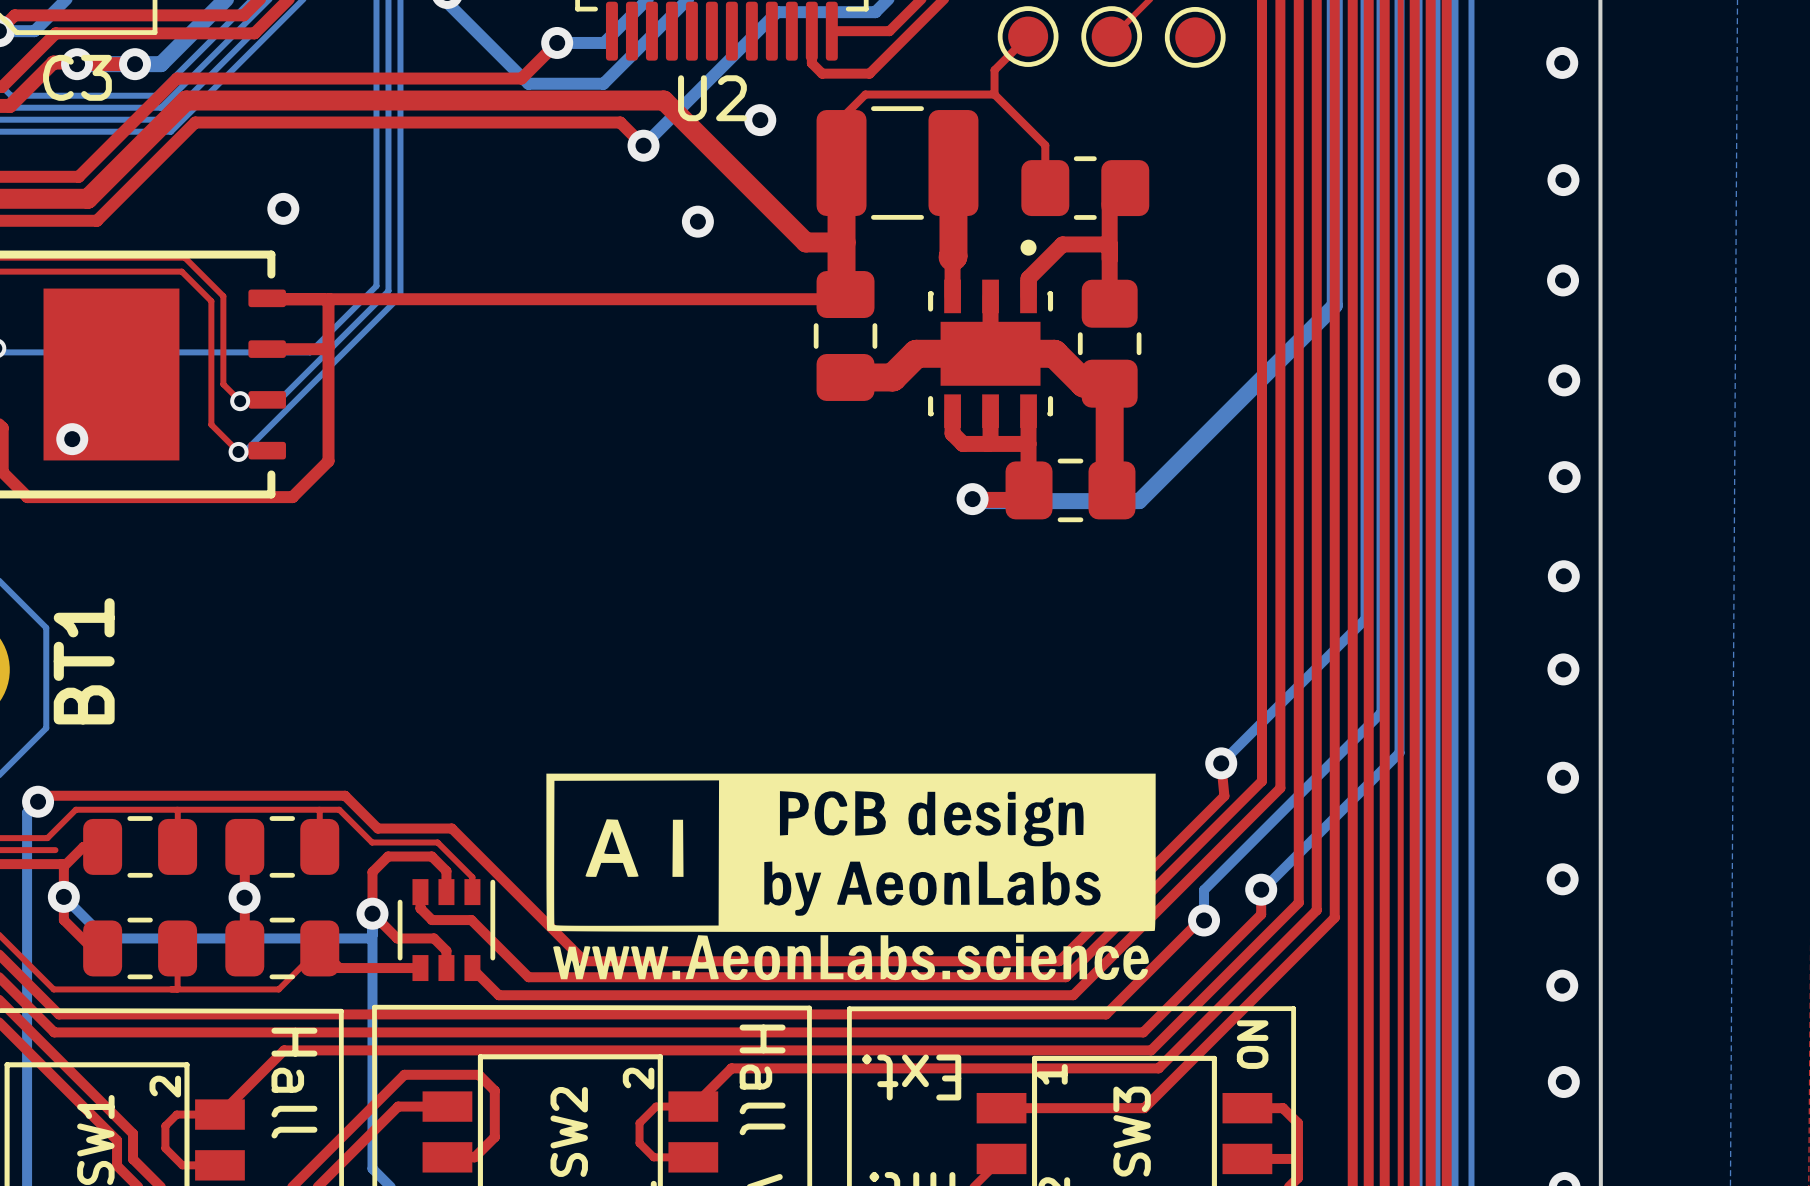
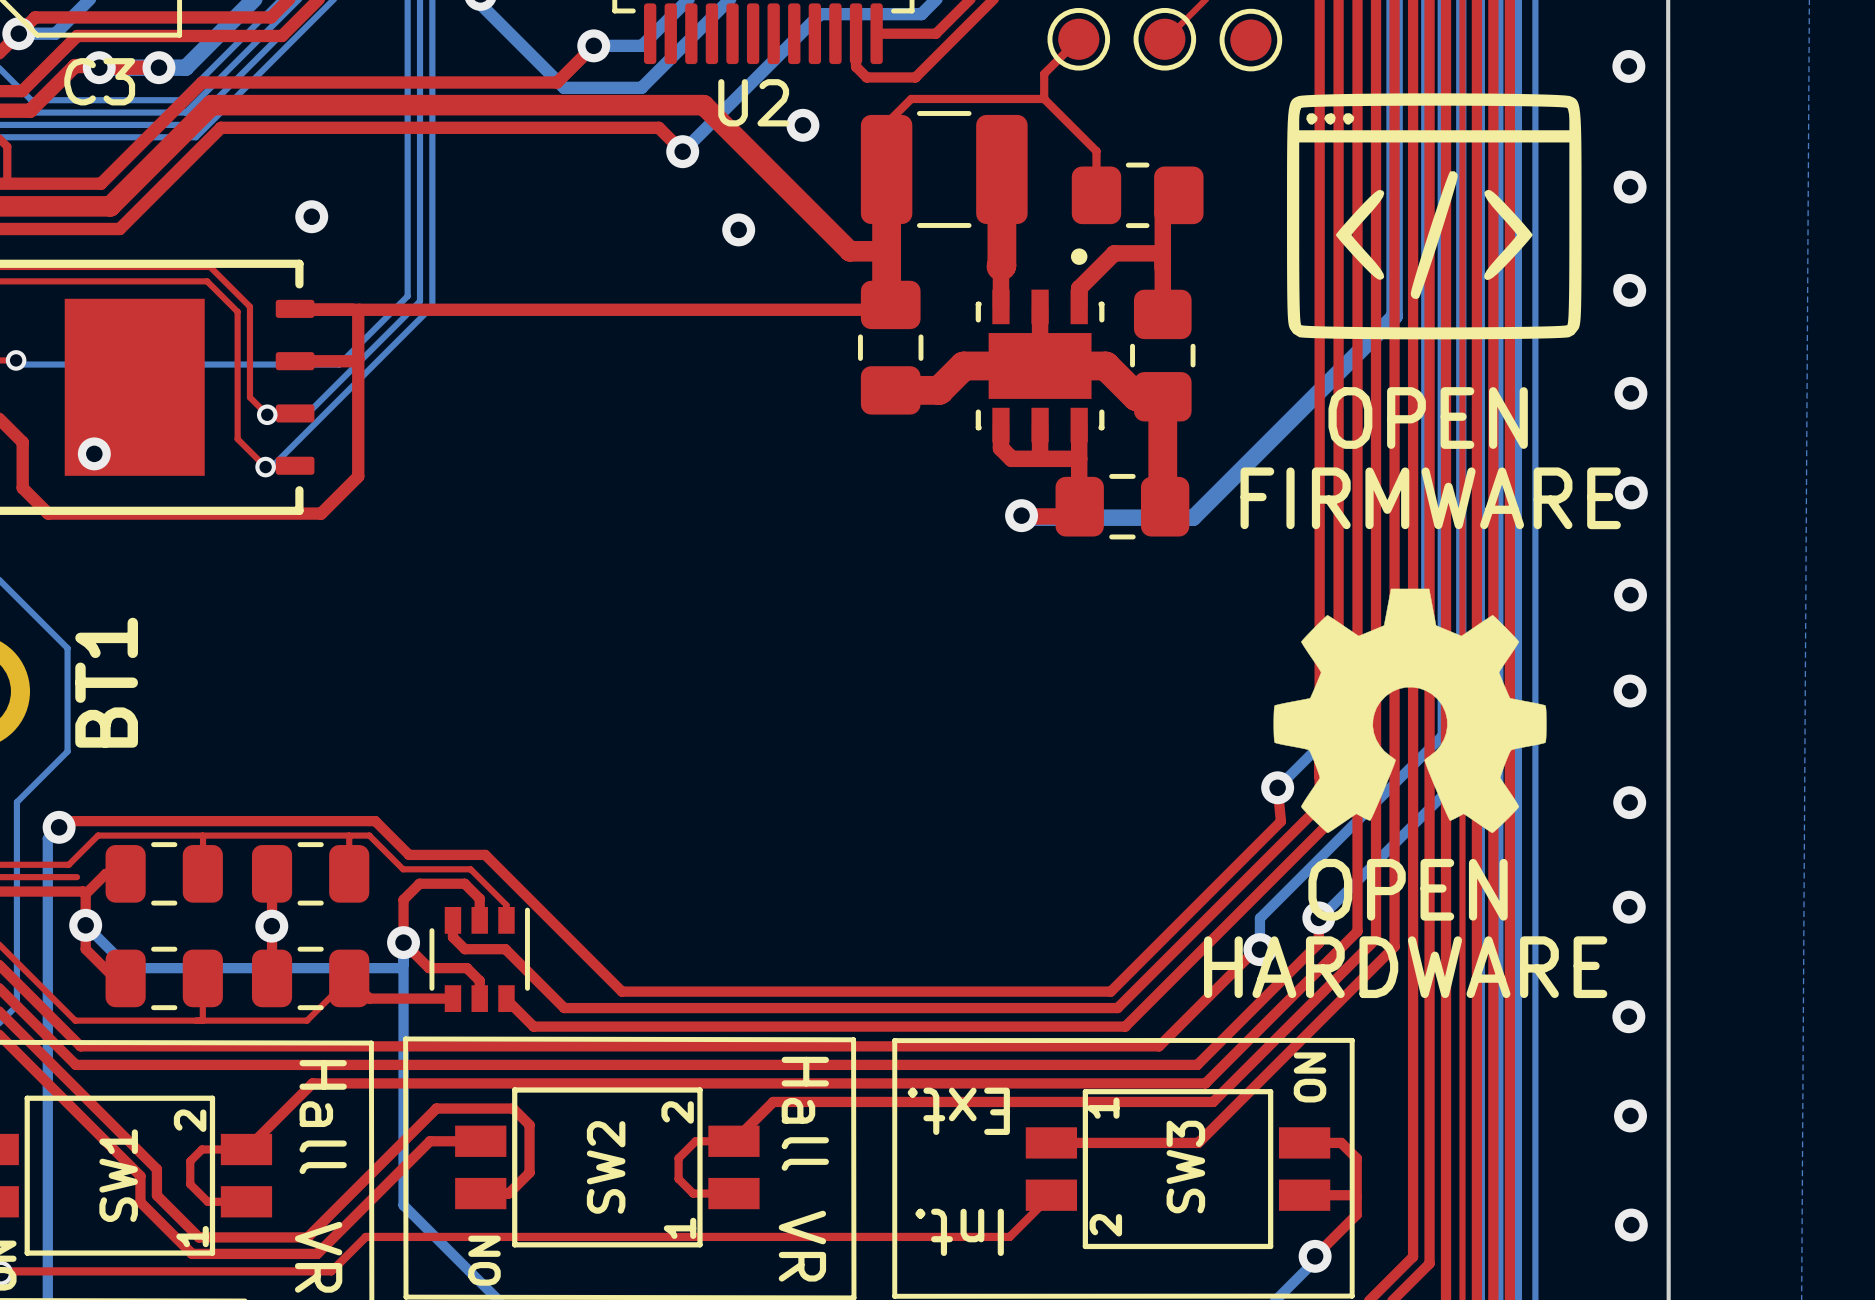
drawing: none -> [1287, 93, 1582, 340]
text: none -> OPEN (1428, 418)
text: none -> FIRMWARE (1430, 498)
drawing: none -> [1273, 588, 1547, 834]
drawing: [546, 773, 1156, 981] -> none
text: none -> OPEN (1408, 889)
text: none -> HARDWARE (1405, 967)

